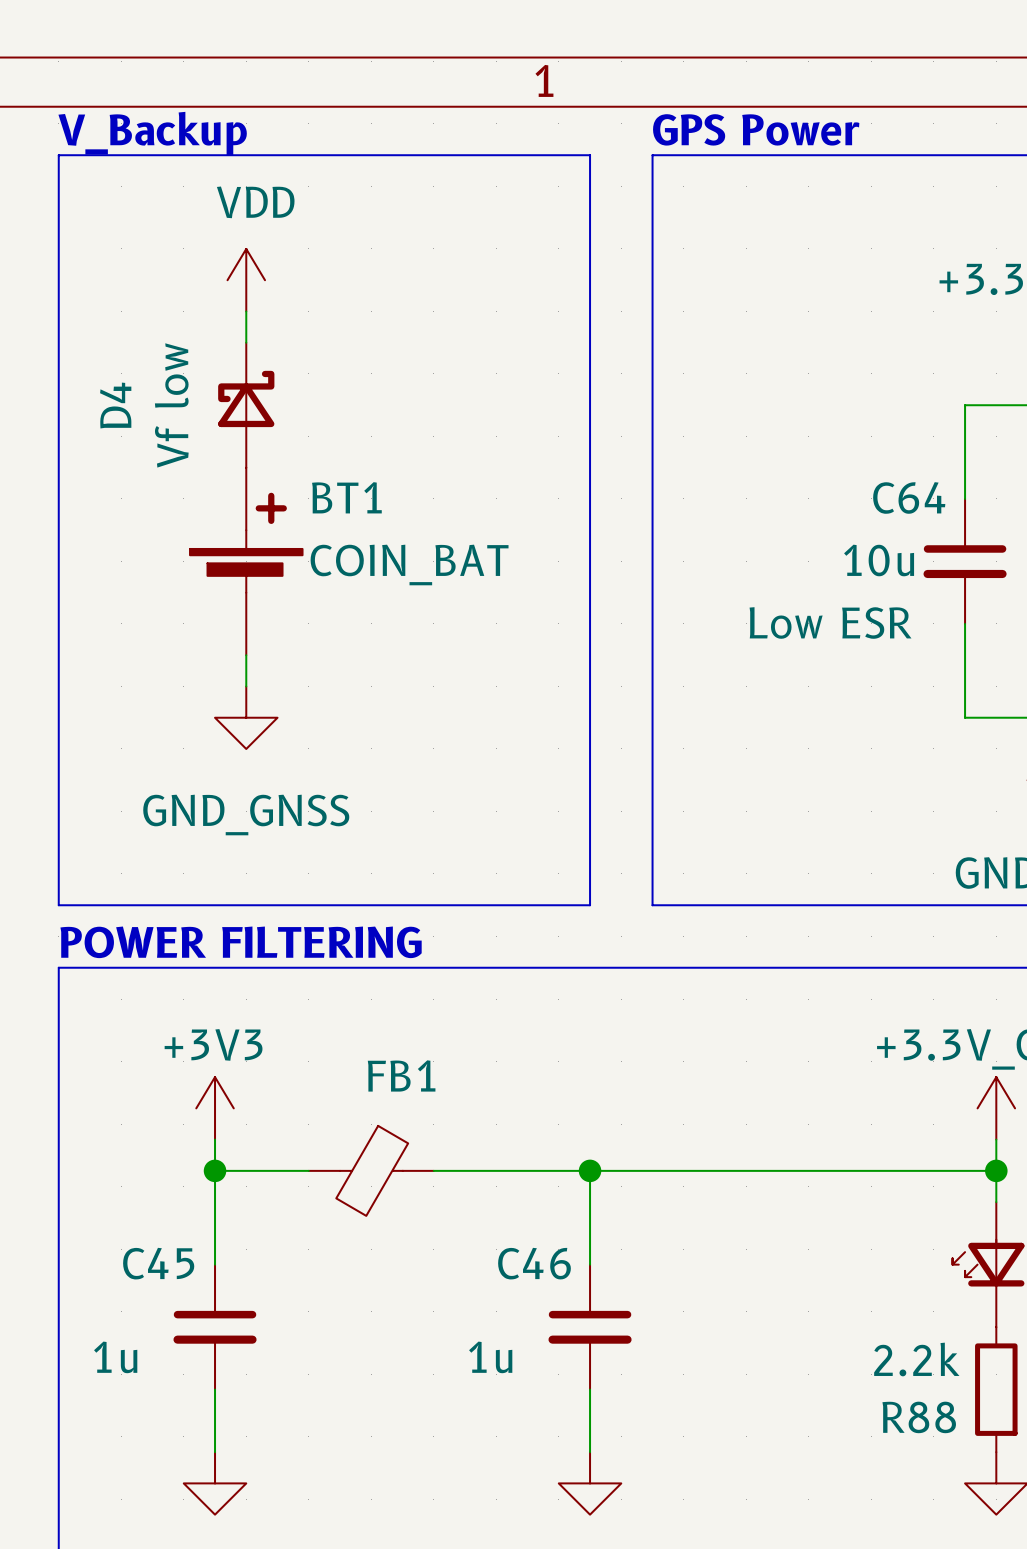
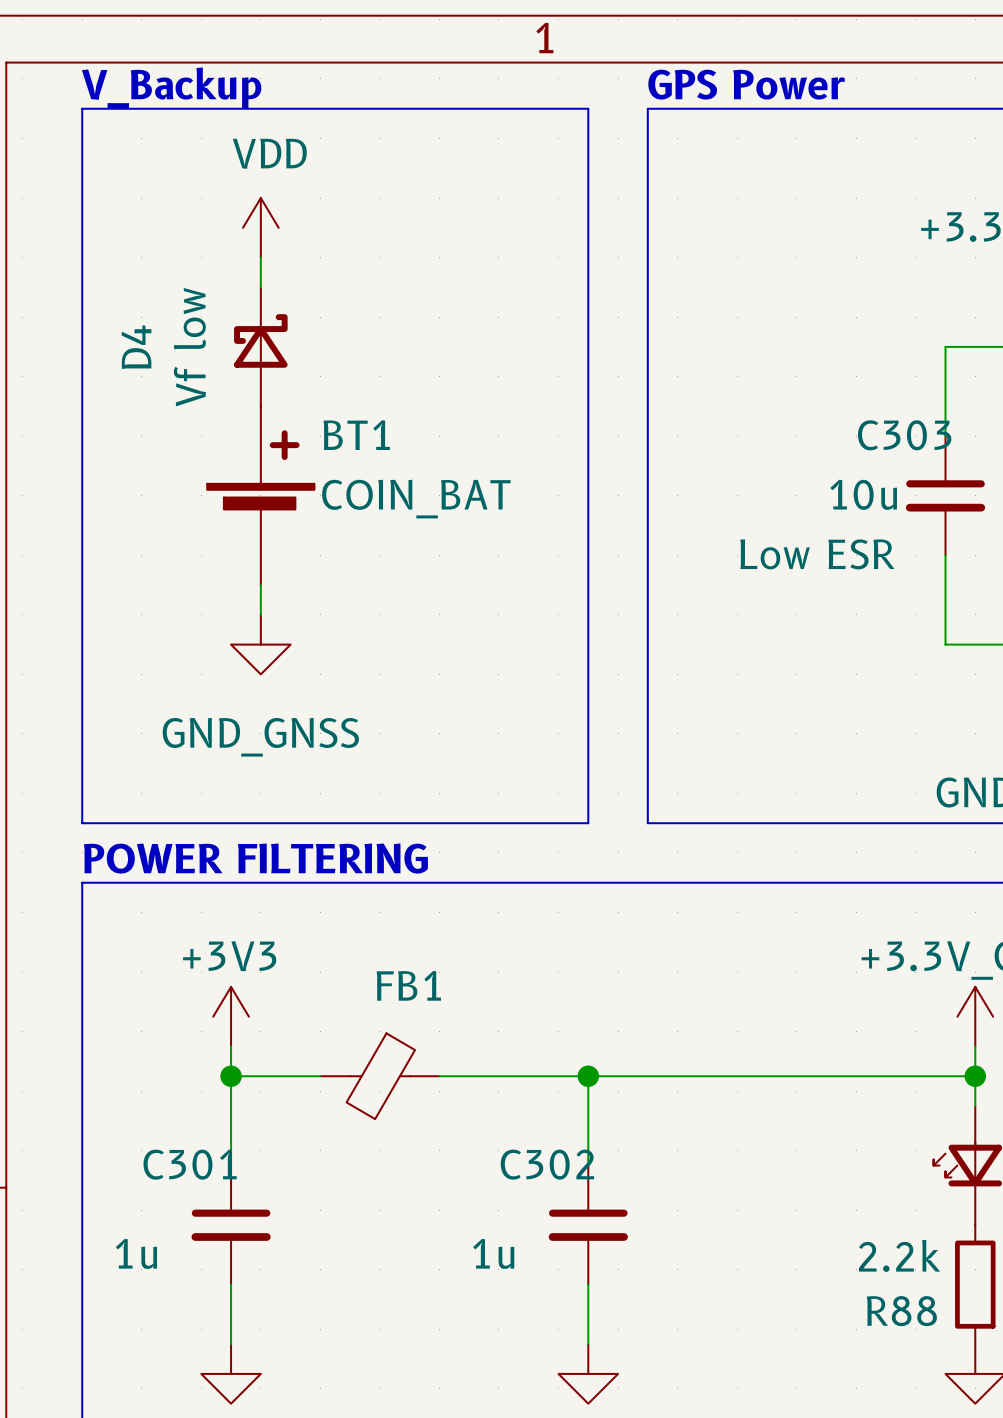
C64 name: C64 (909, 497) -> C303 (904, 435)
C45 name: C45 (158, 1263) -> C301 (190, 1164)
C46 name: C46 (534, 1263) -> C302 (547, 1164)

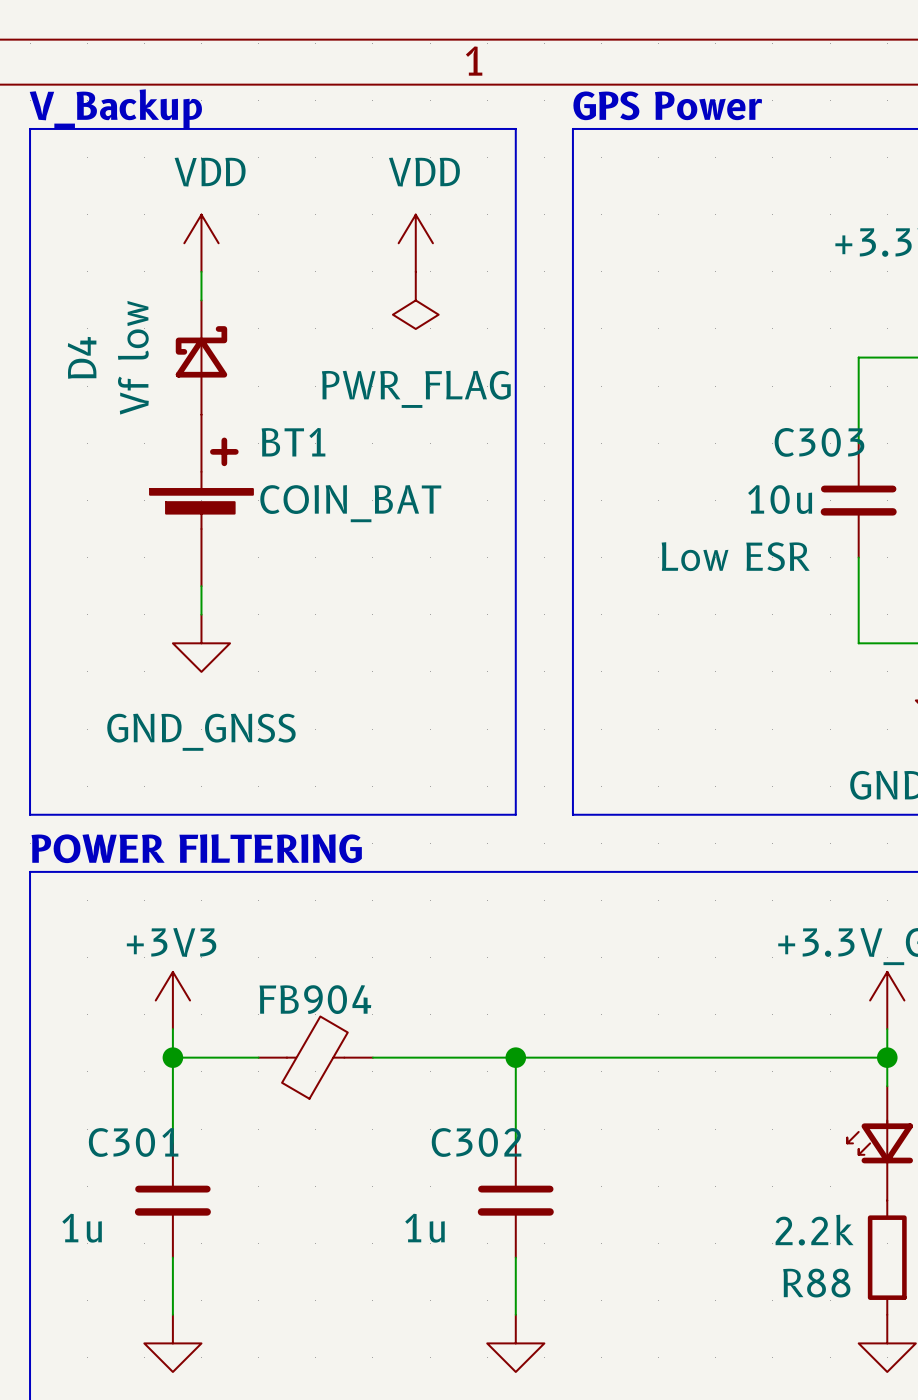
power symbol: none -> VDD (415, 243)
power symbol: none -> PWR_FLAG (415, 300)
FB1: (379, 1076) -> none
FB904: none -> (315, 1057)

